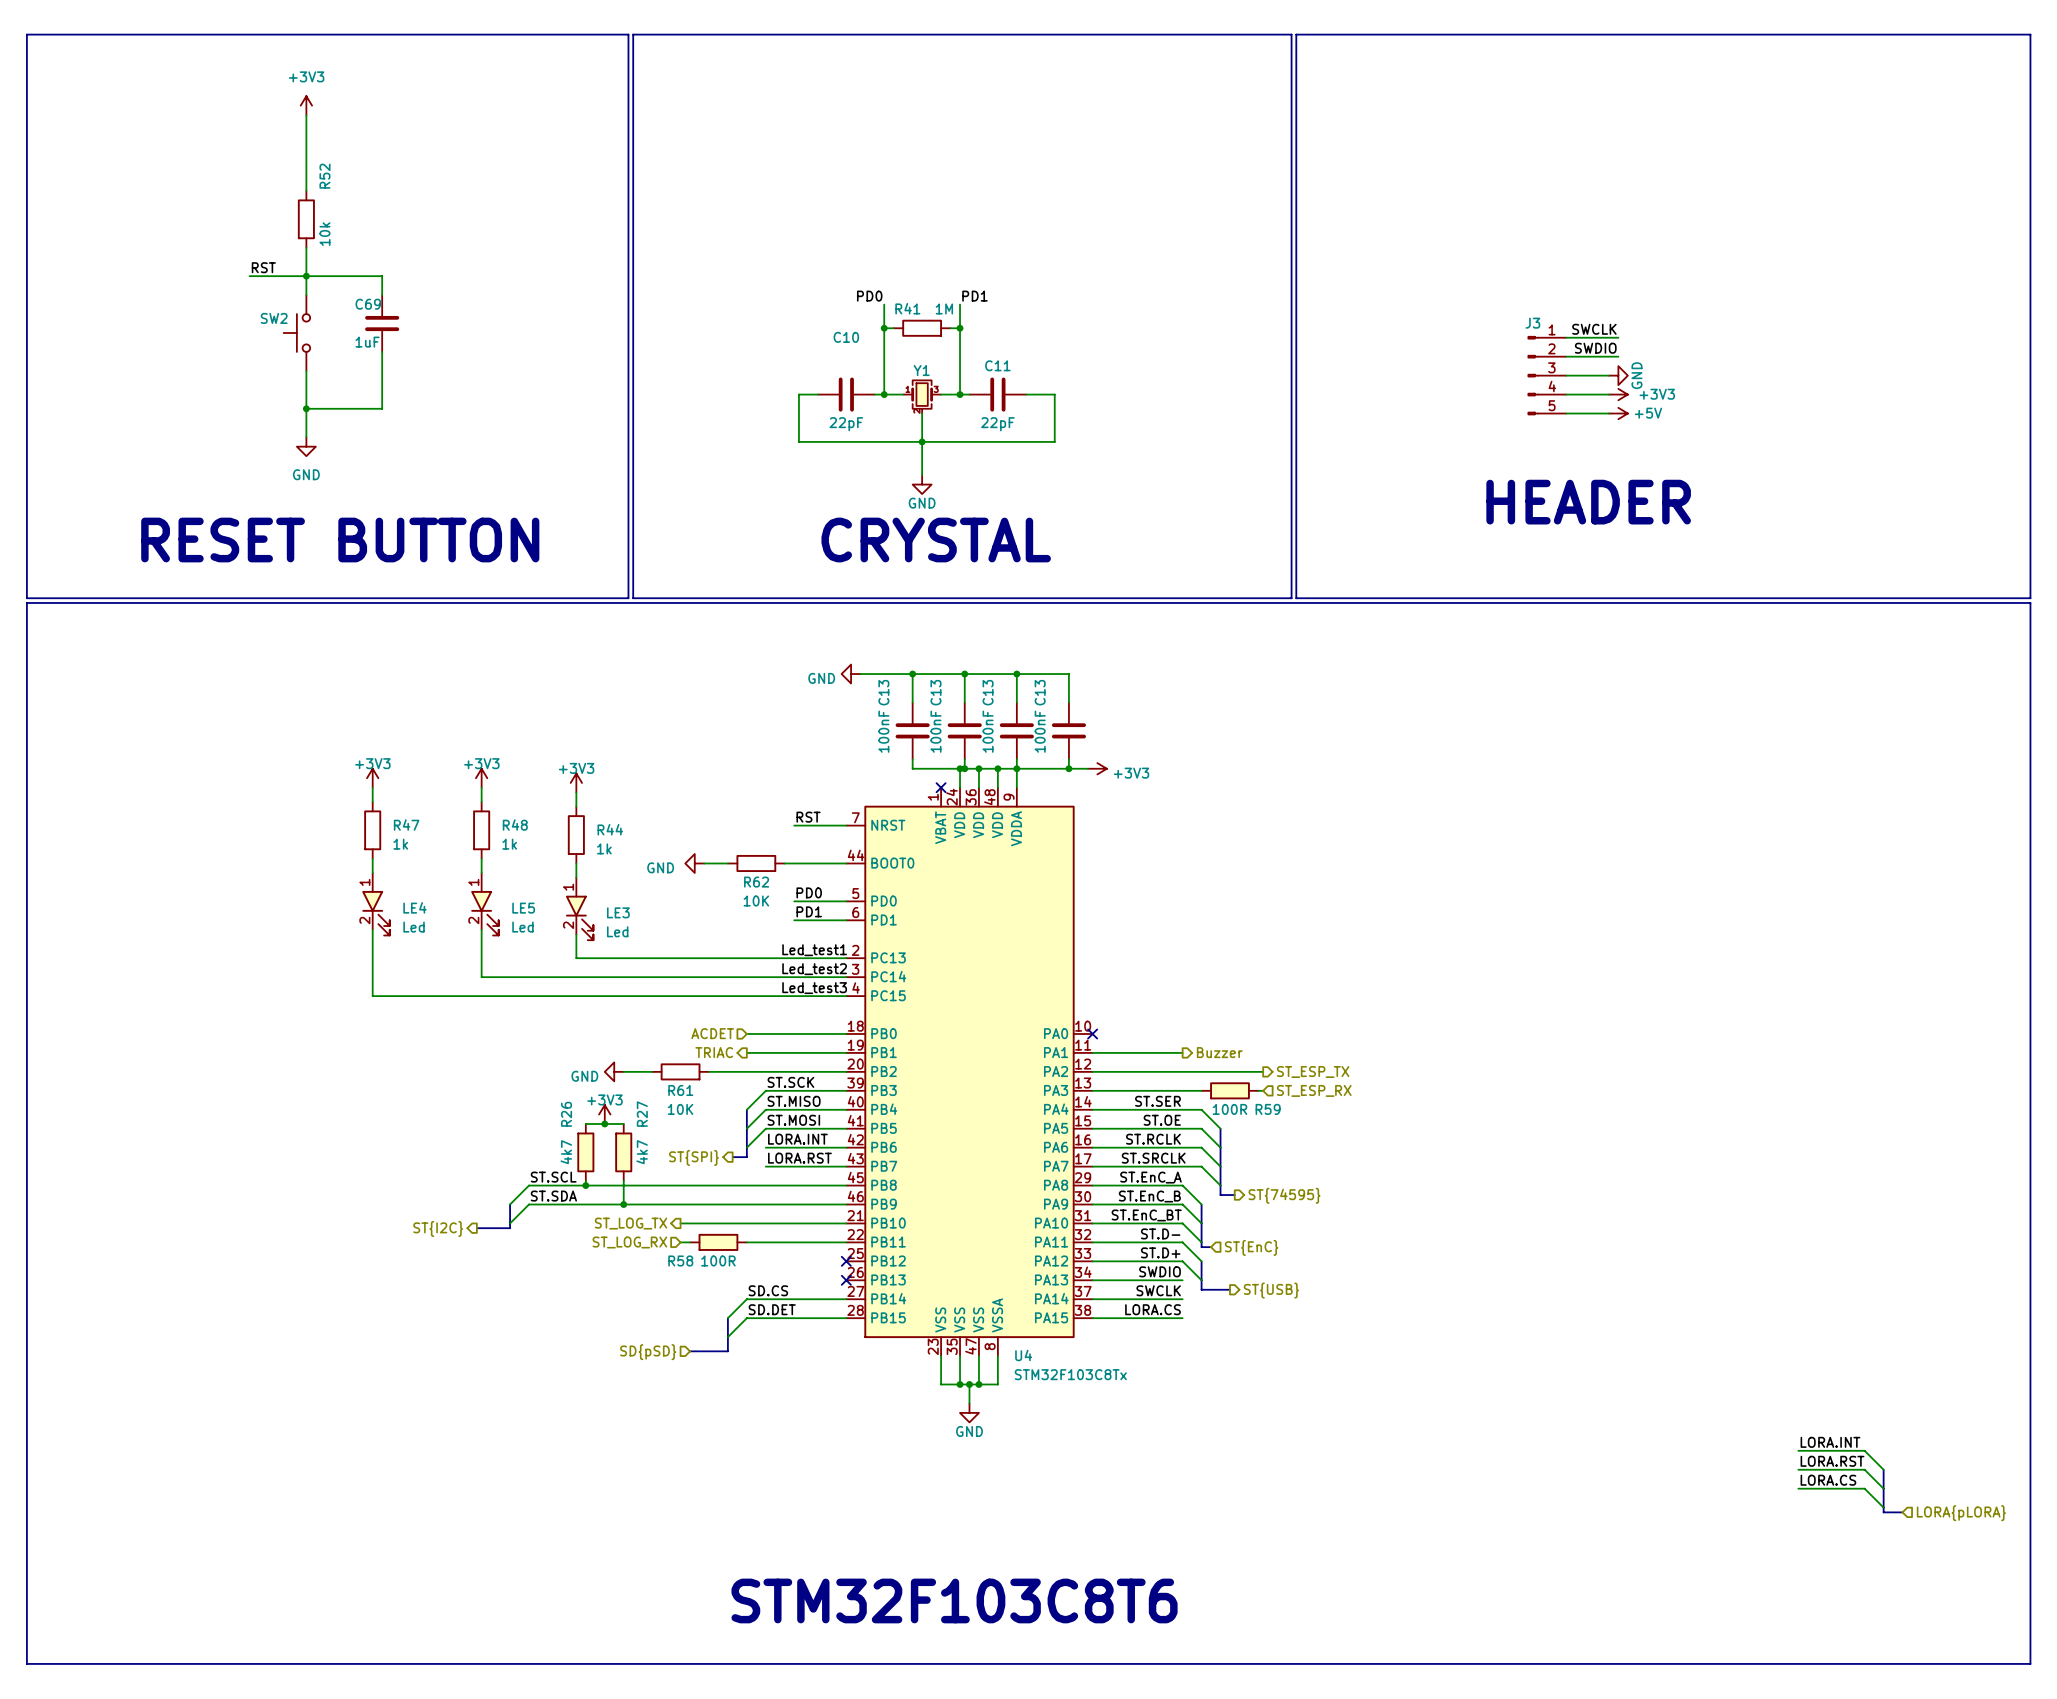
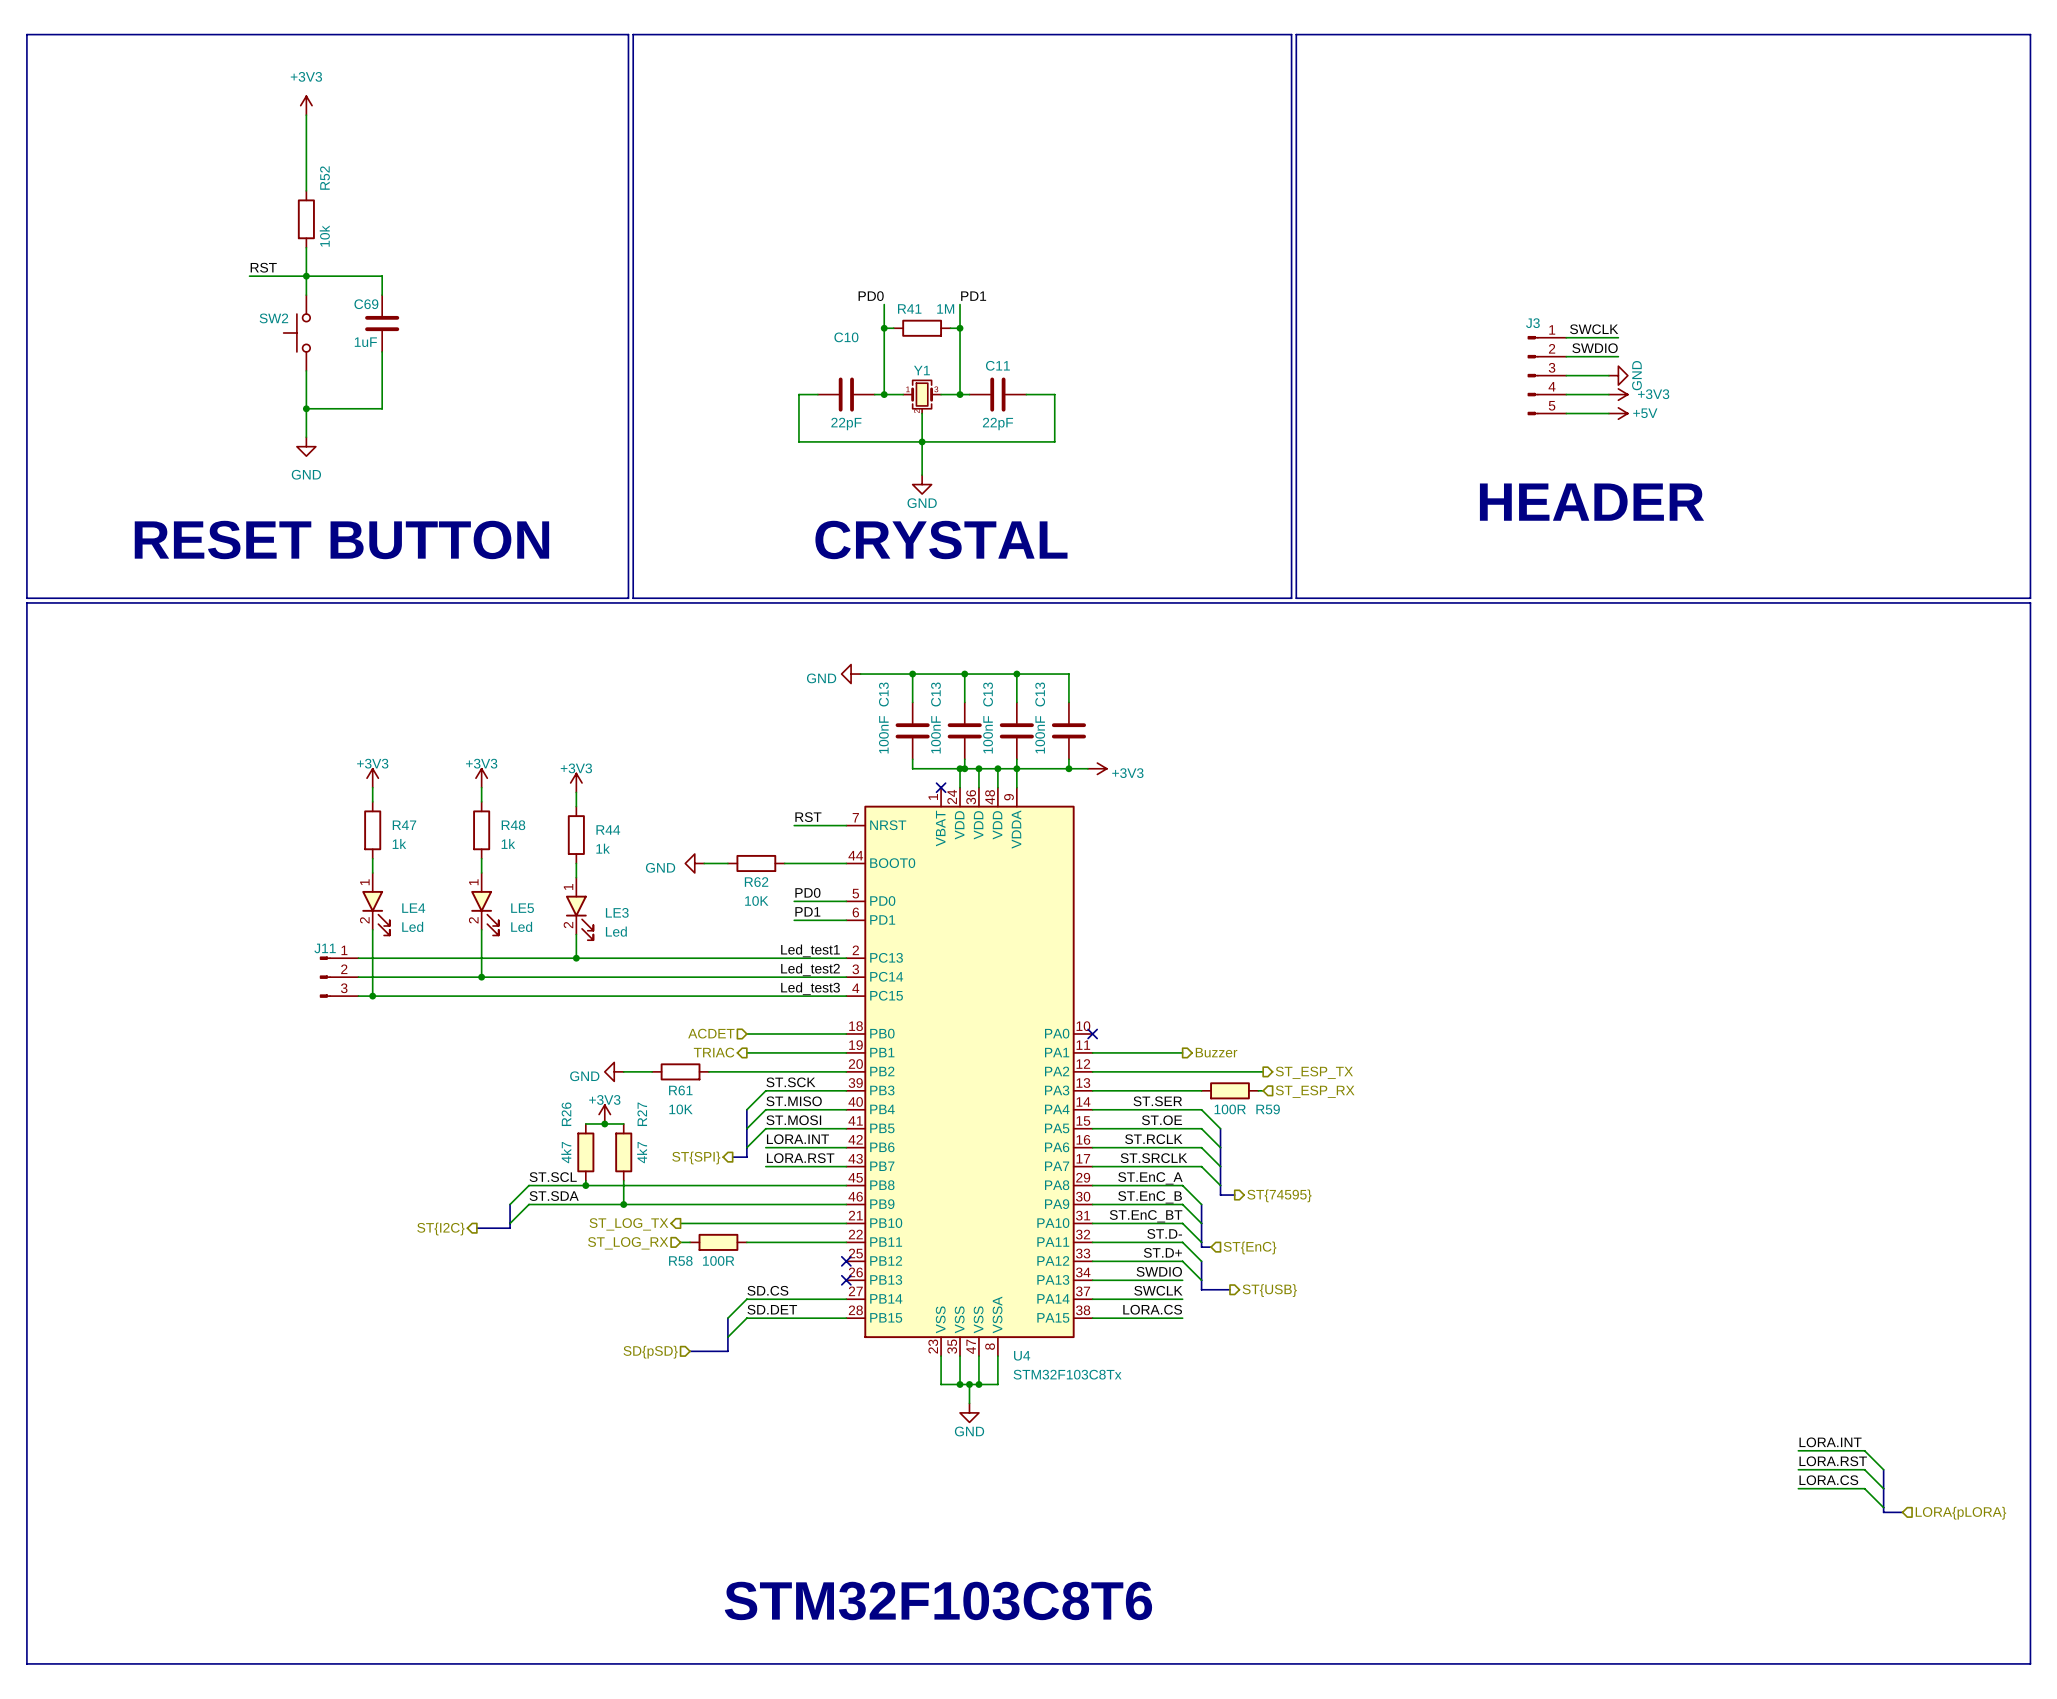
wire: none -> (358, 958) (576, 958)
junction: none -> (576, 958)
J11: none -> (339, 977)
wire: none -> (358, 977) (481, 977)
junction: none -> (481, 977)
wire: none -> (358, 996) (372, 996)
junction: none -> (372, 996)

